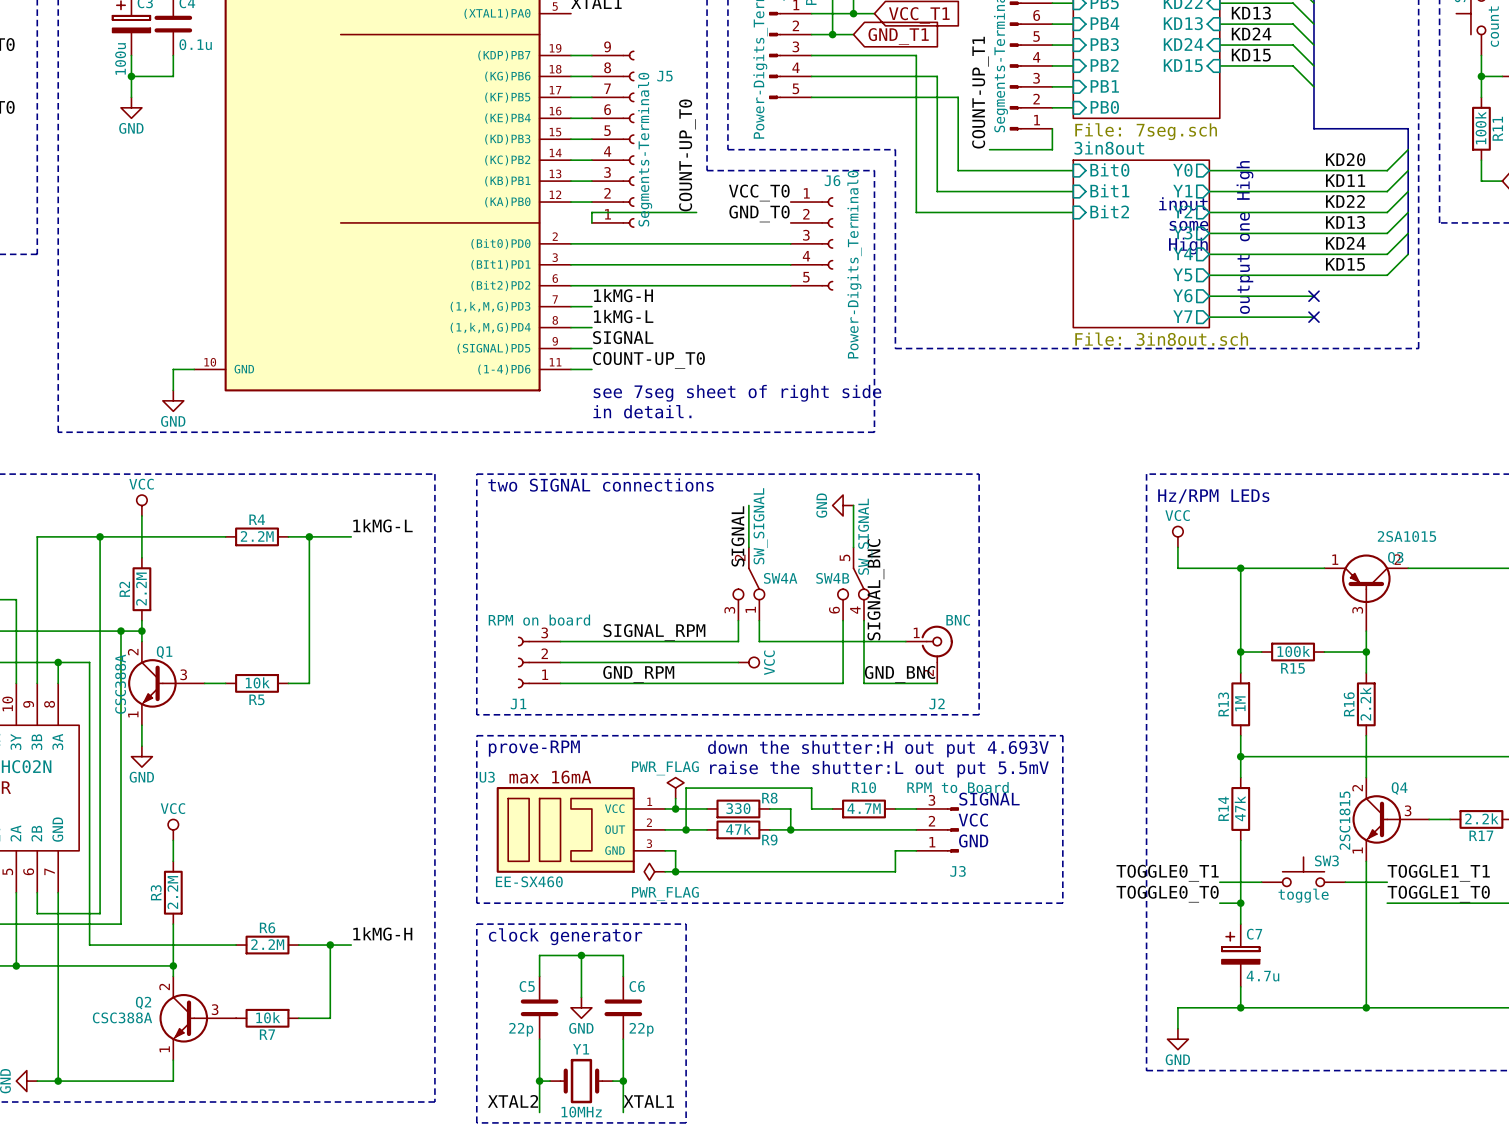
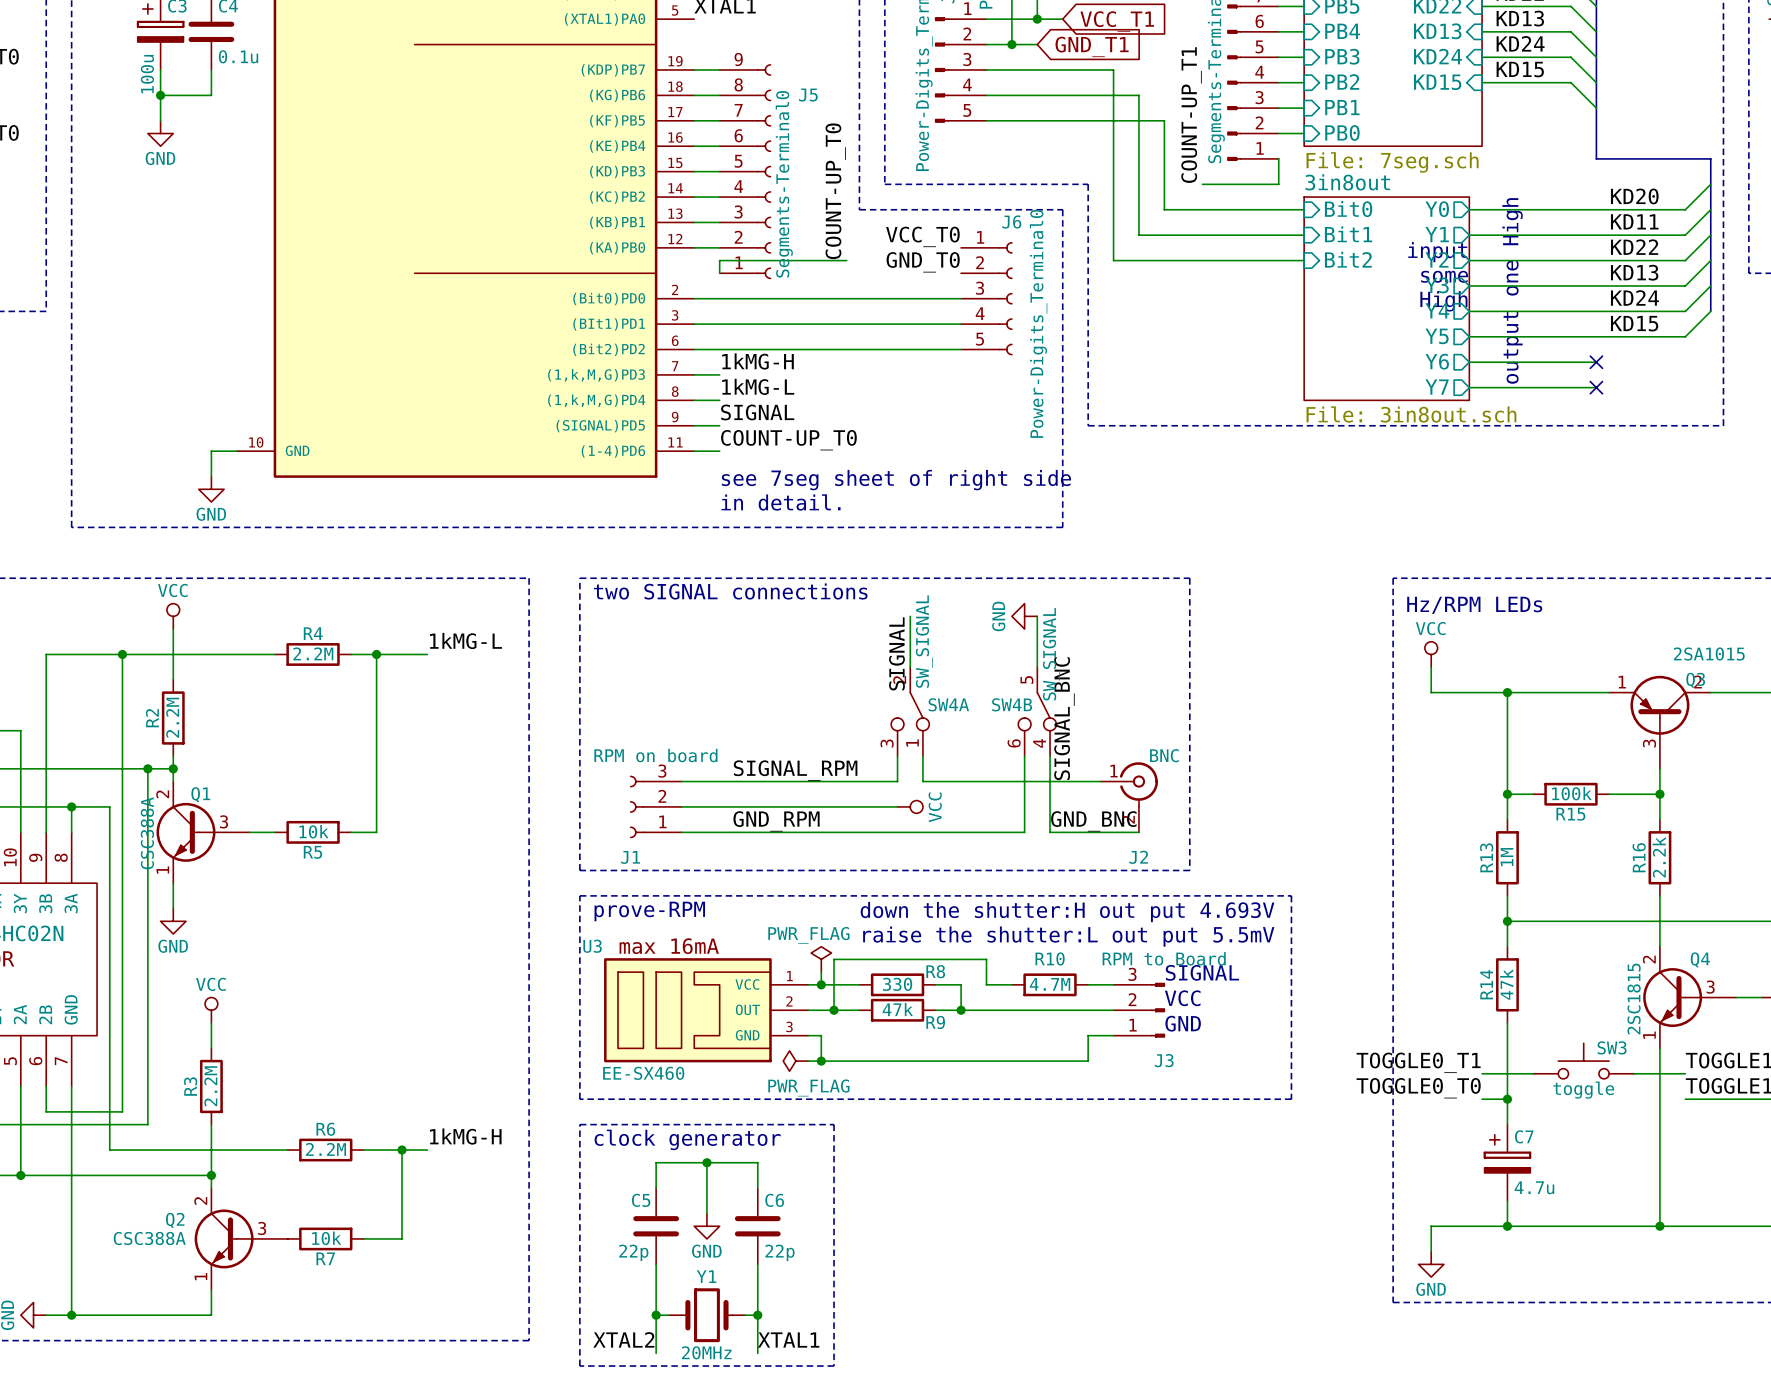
Y1 value: 10MHz (581, 1112) -> 20MHz (706, 1352)

